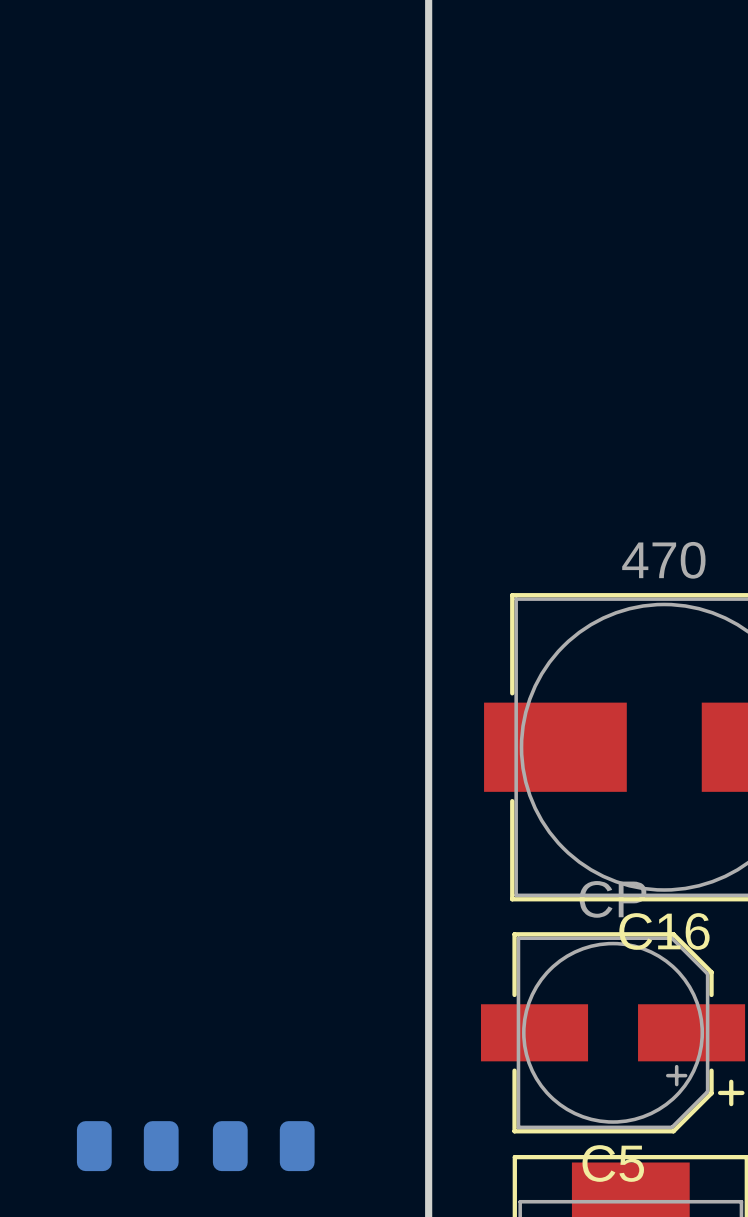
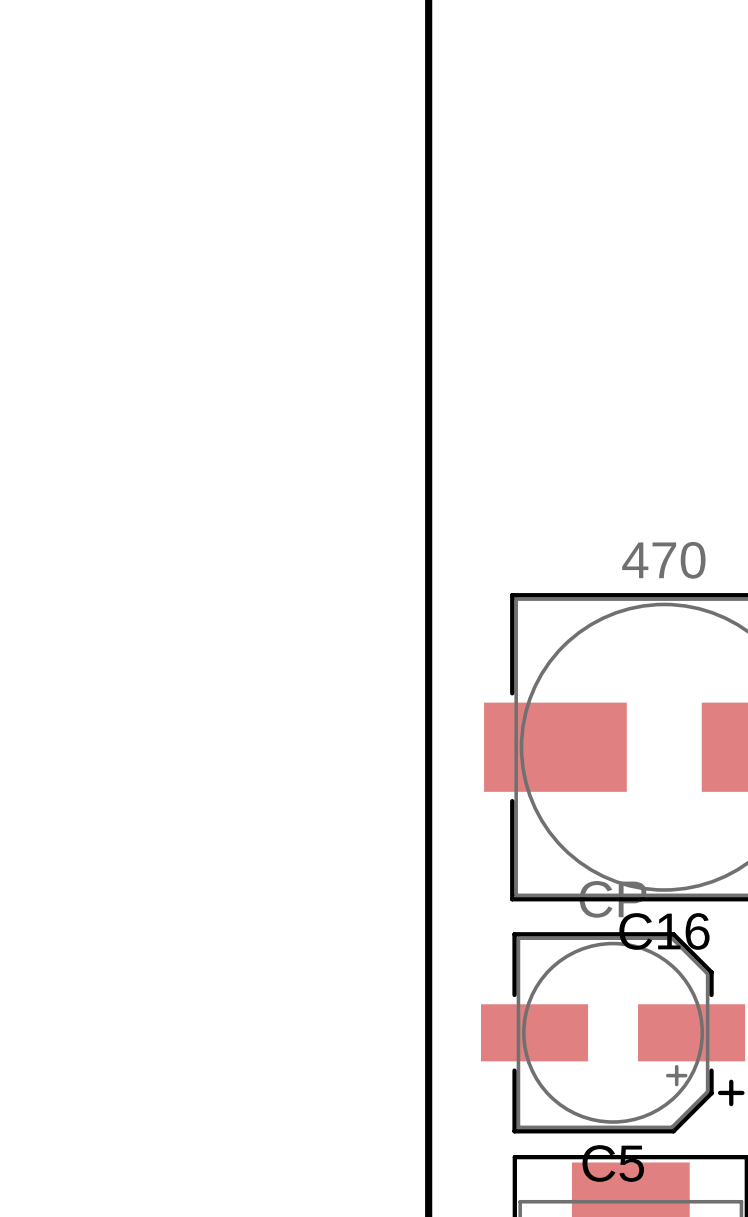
part: (127, 1146) -> none
part: (263, 1146) -> none

